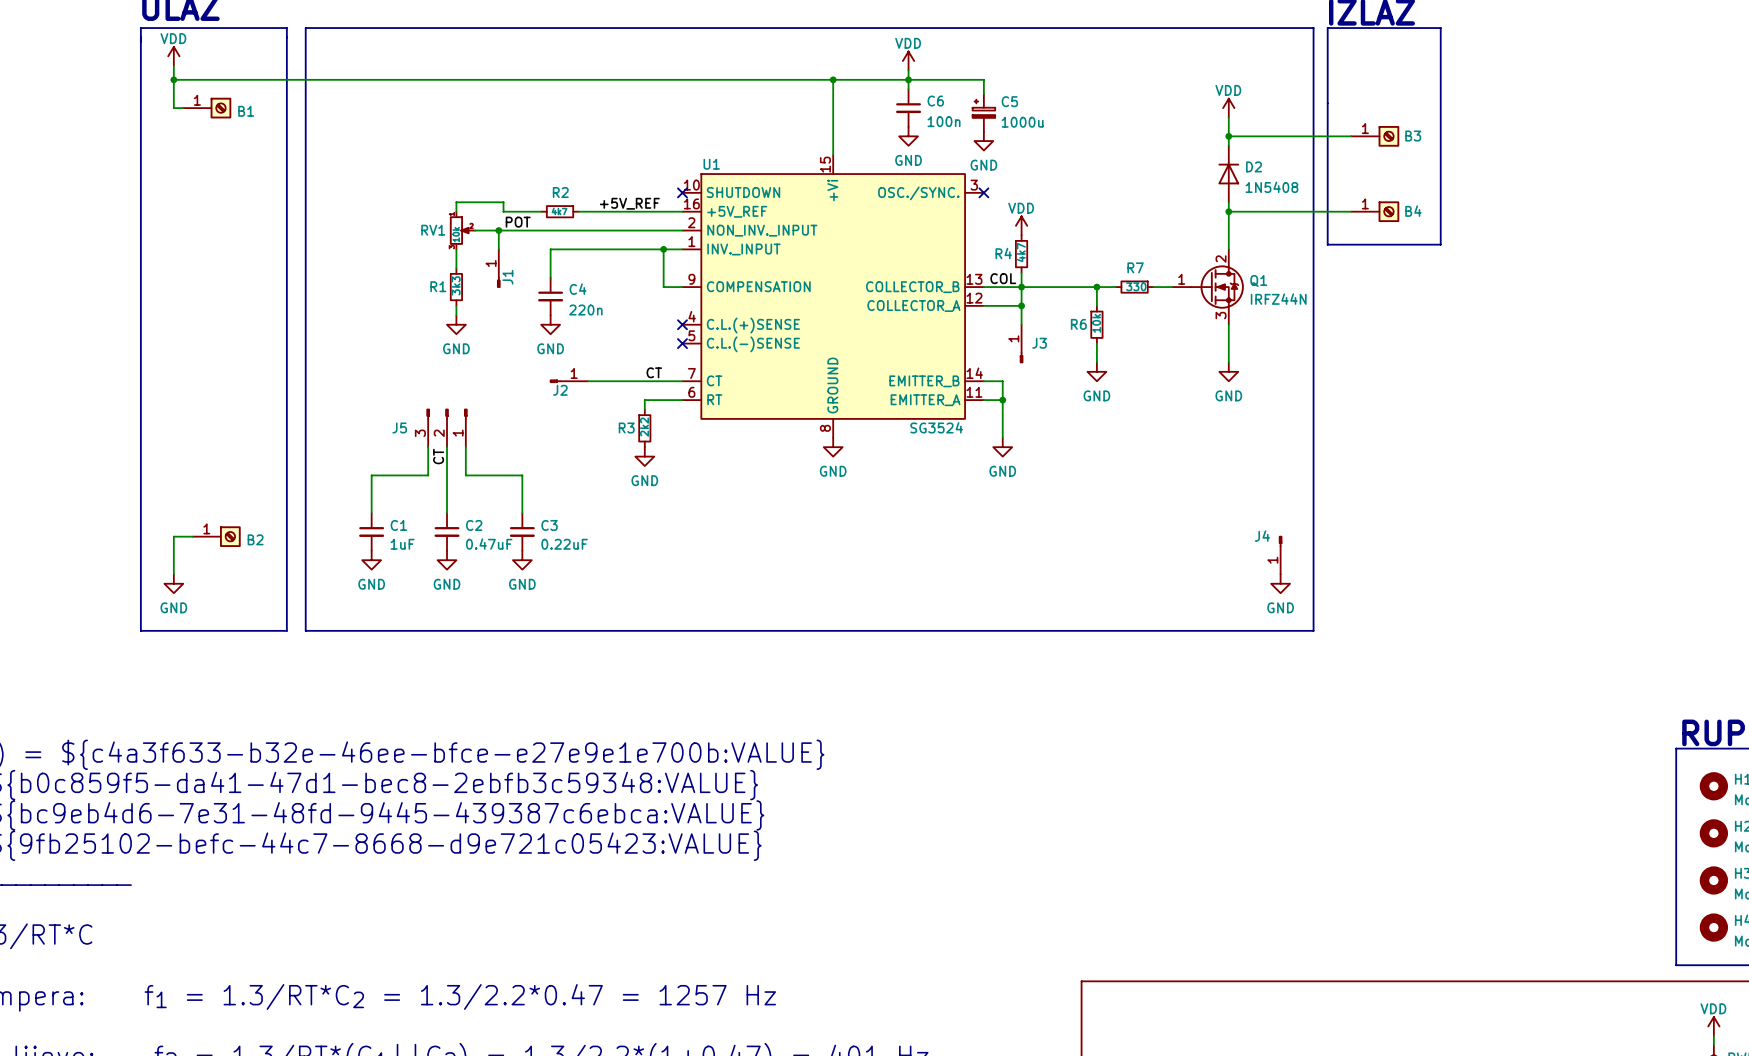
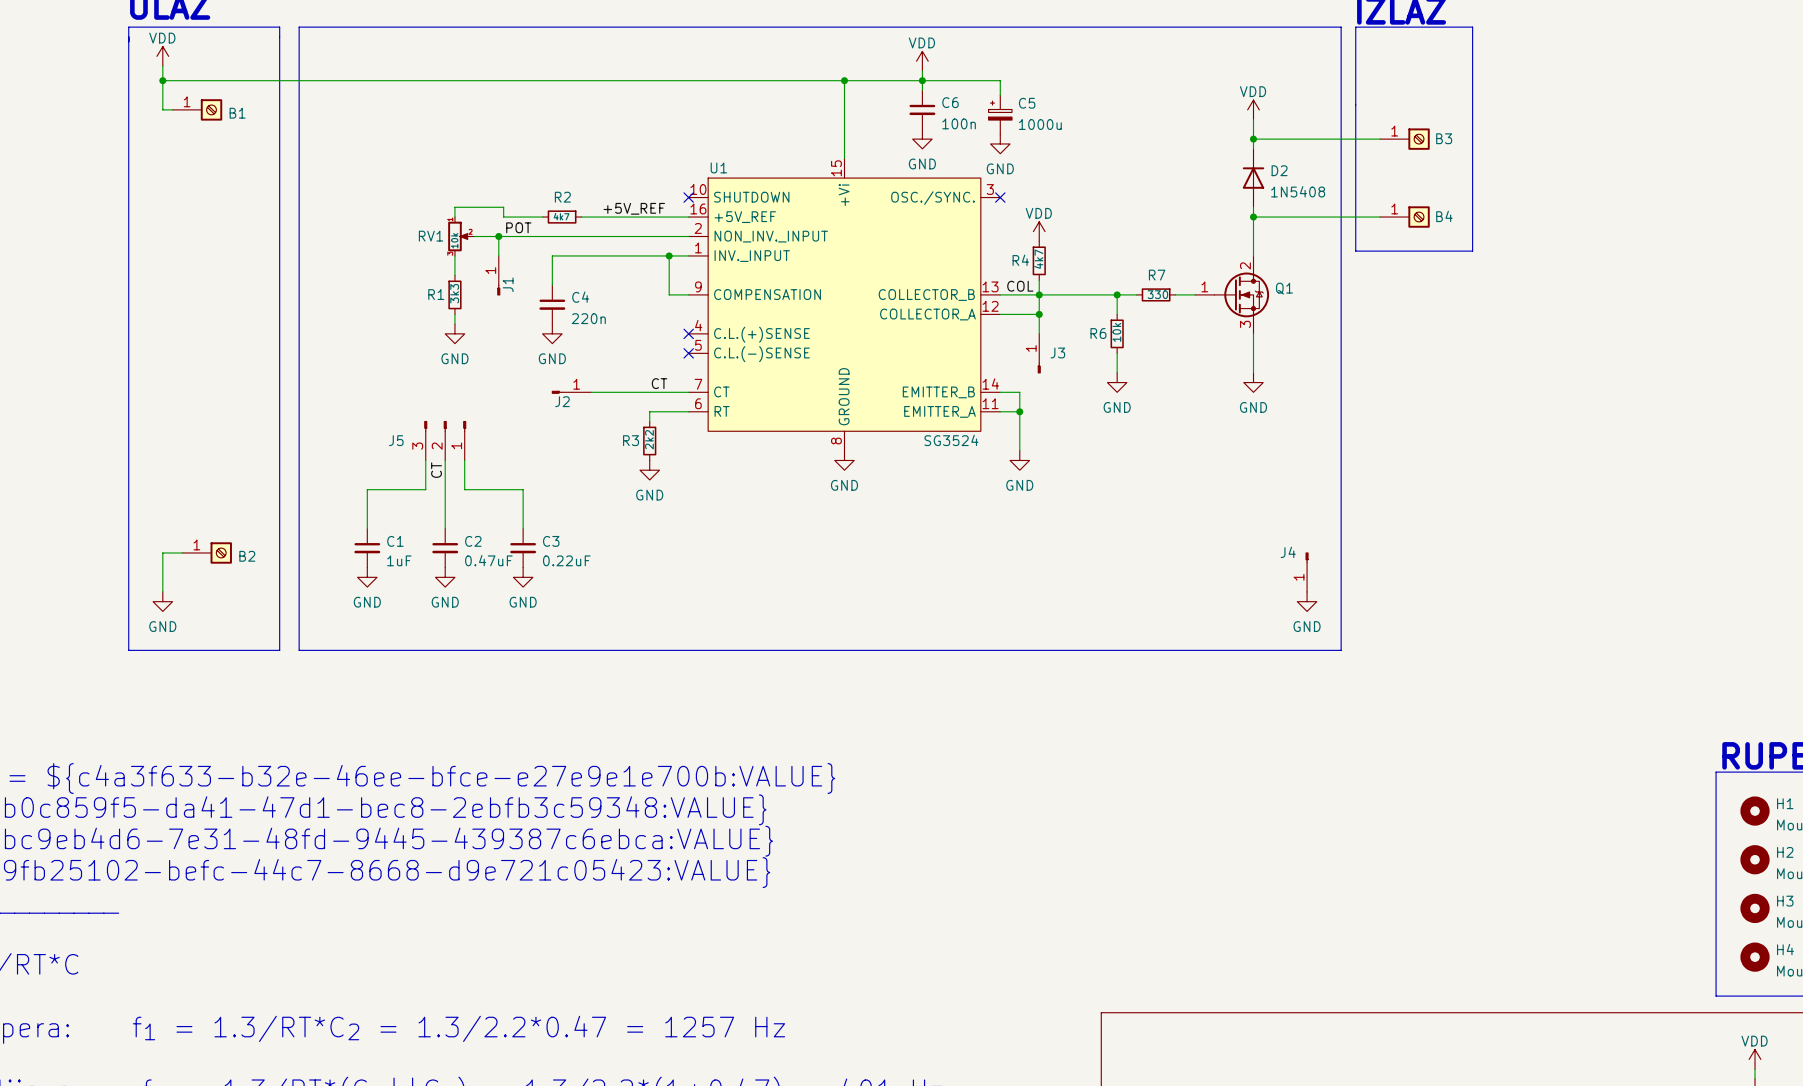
Q1 value: IRFZ44N (1278, 299) -> none

